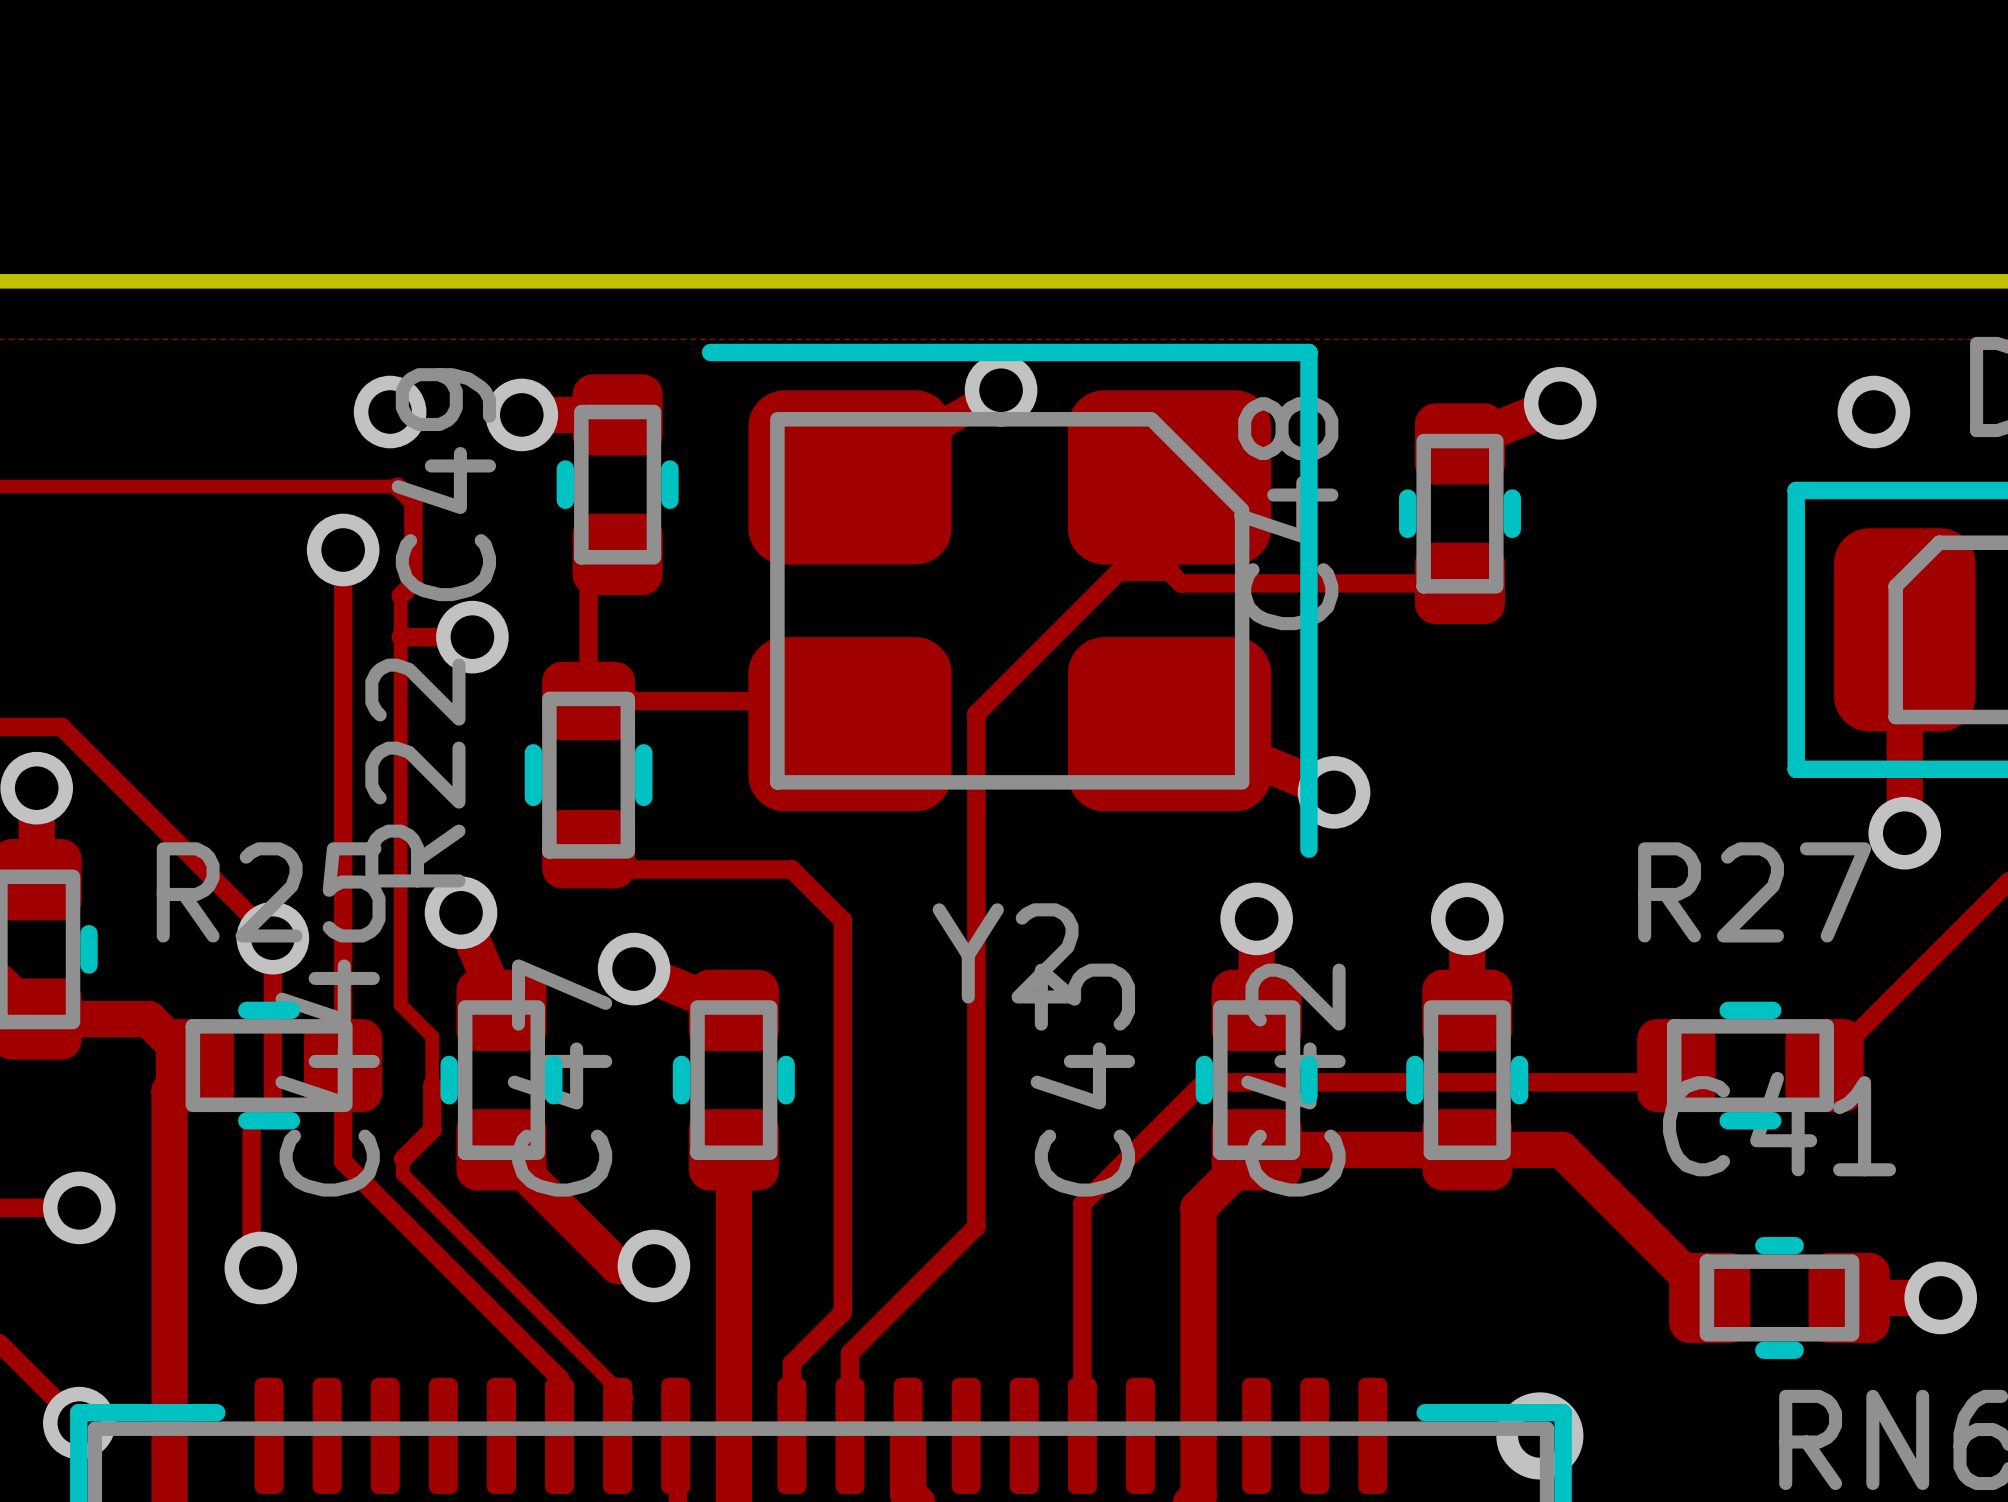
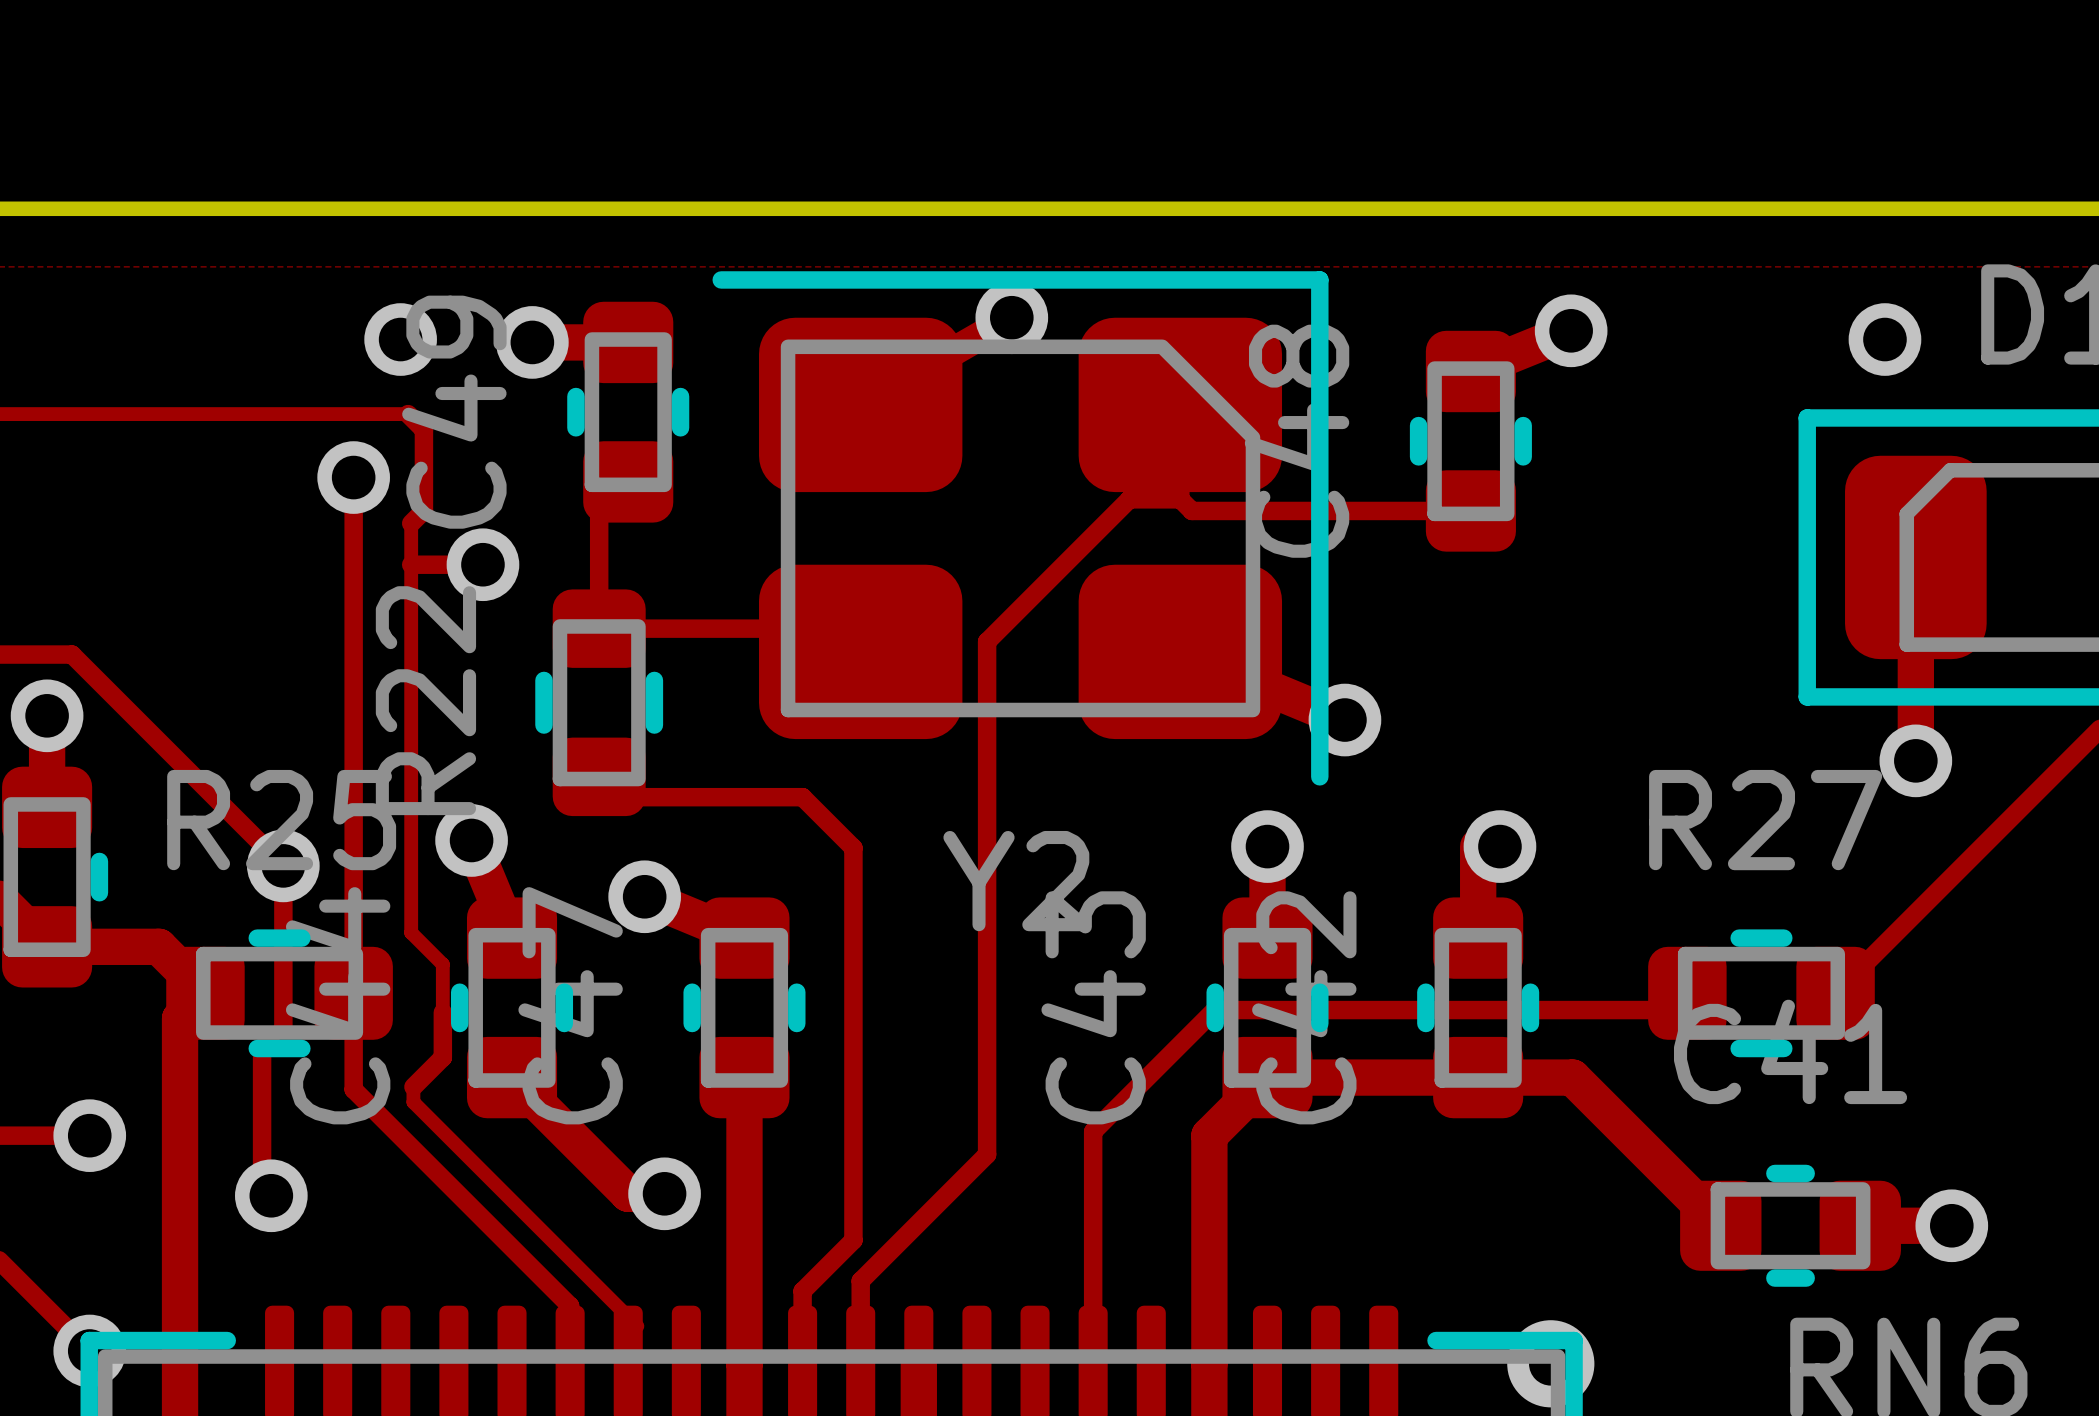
via position: (1467, 918) -> (1499, 846)

